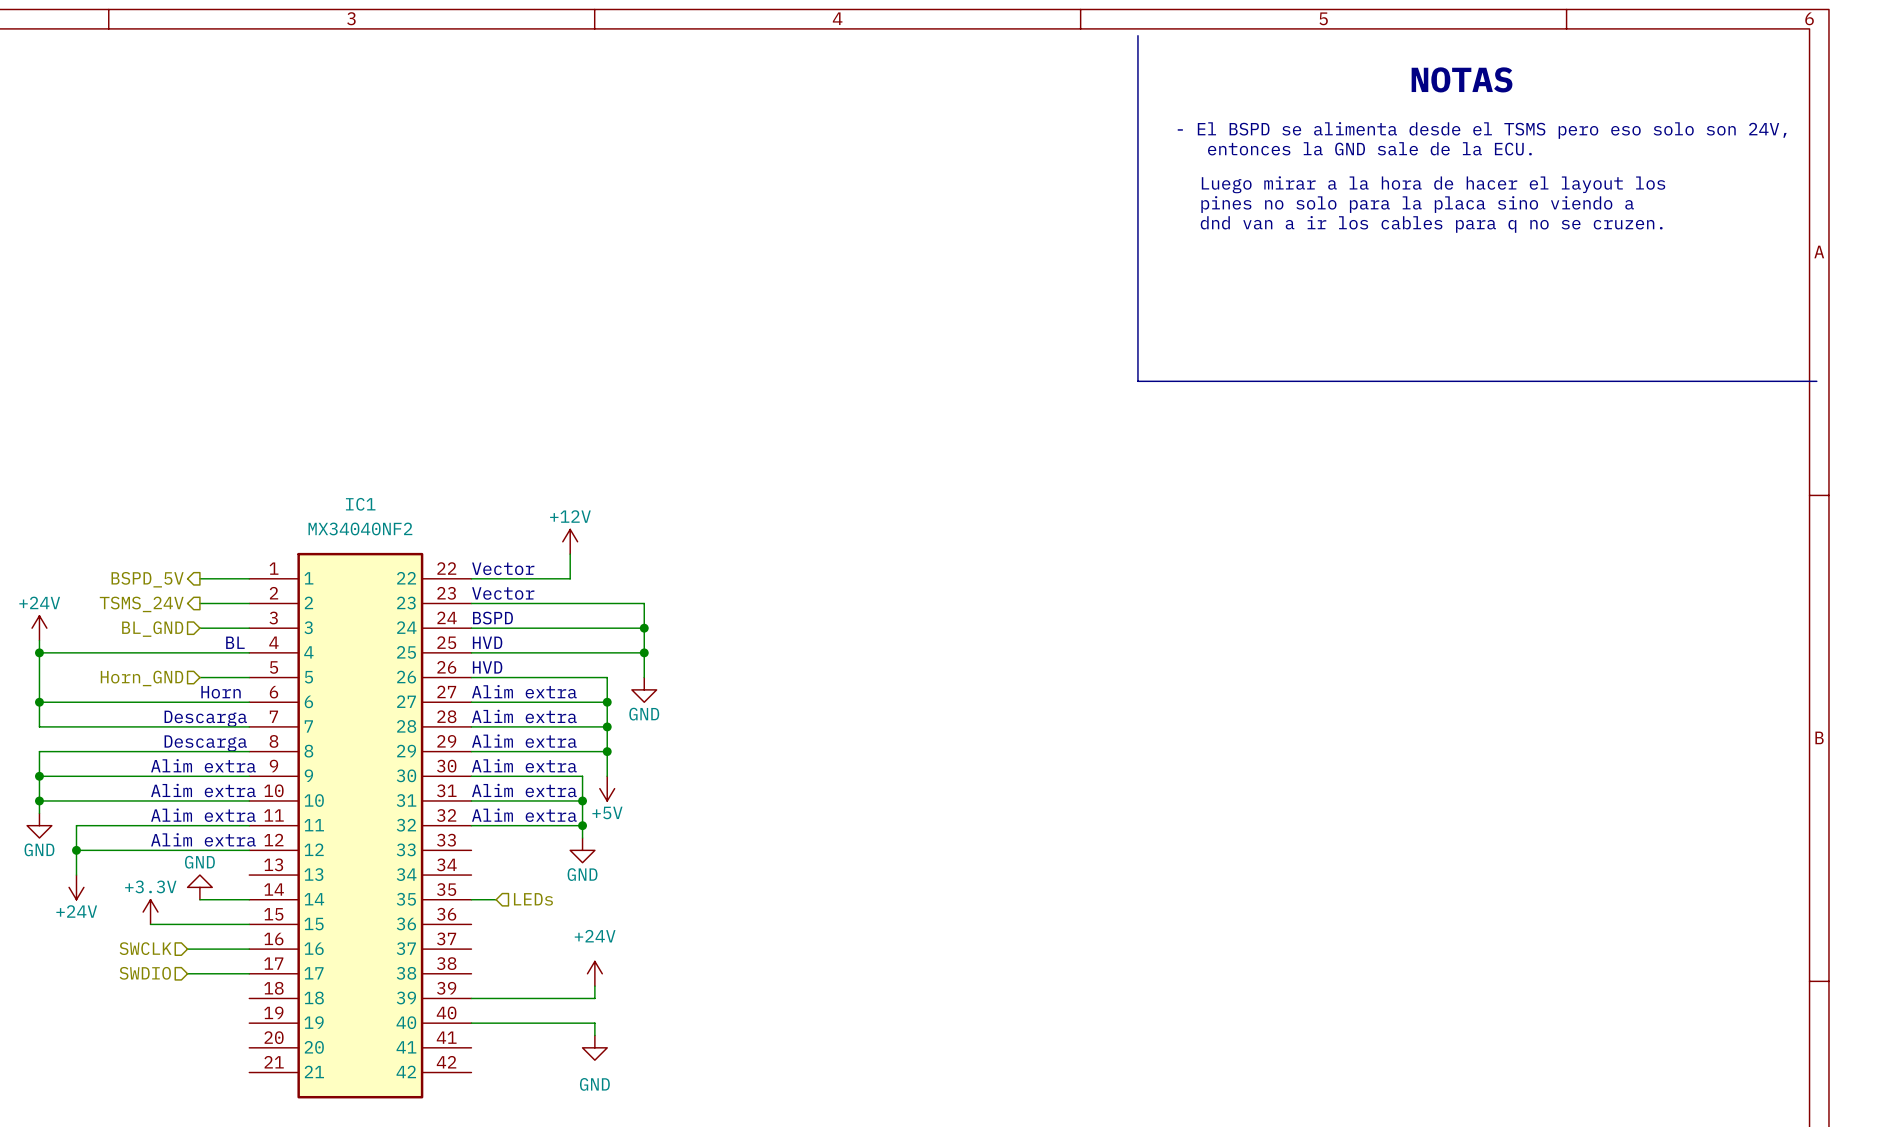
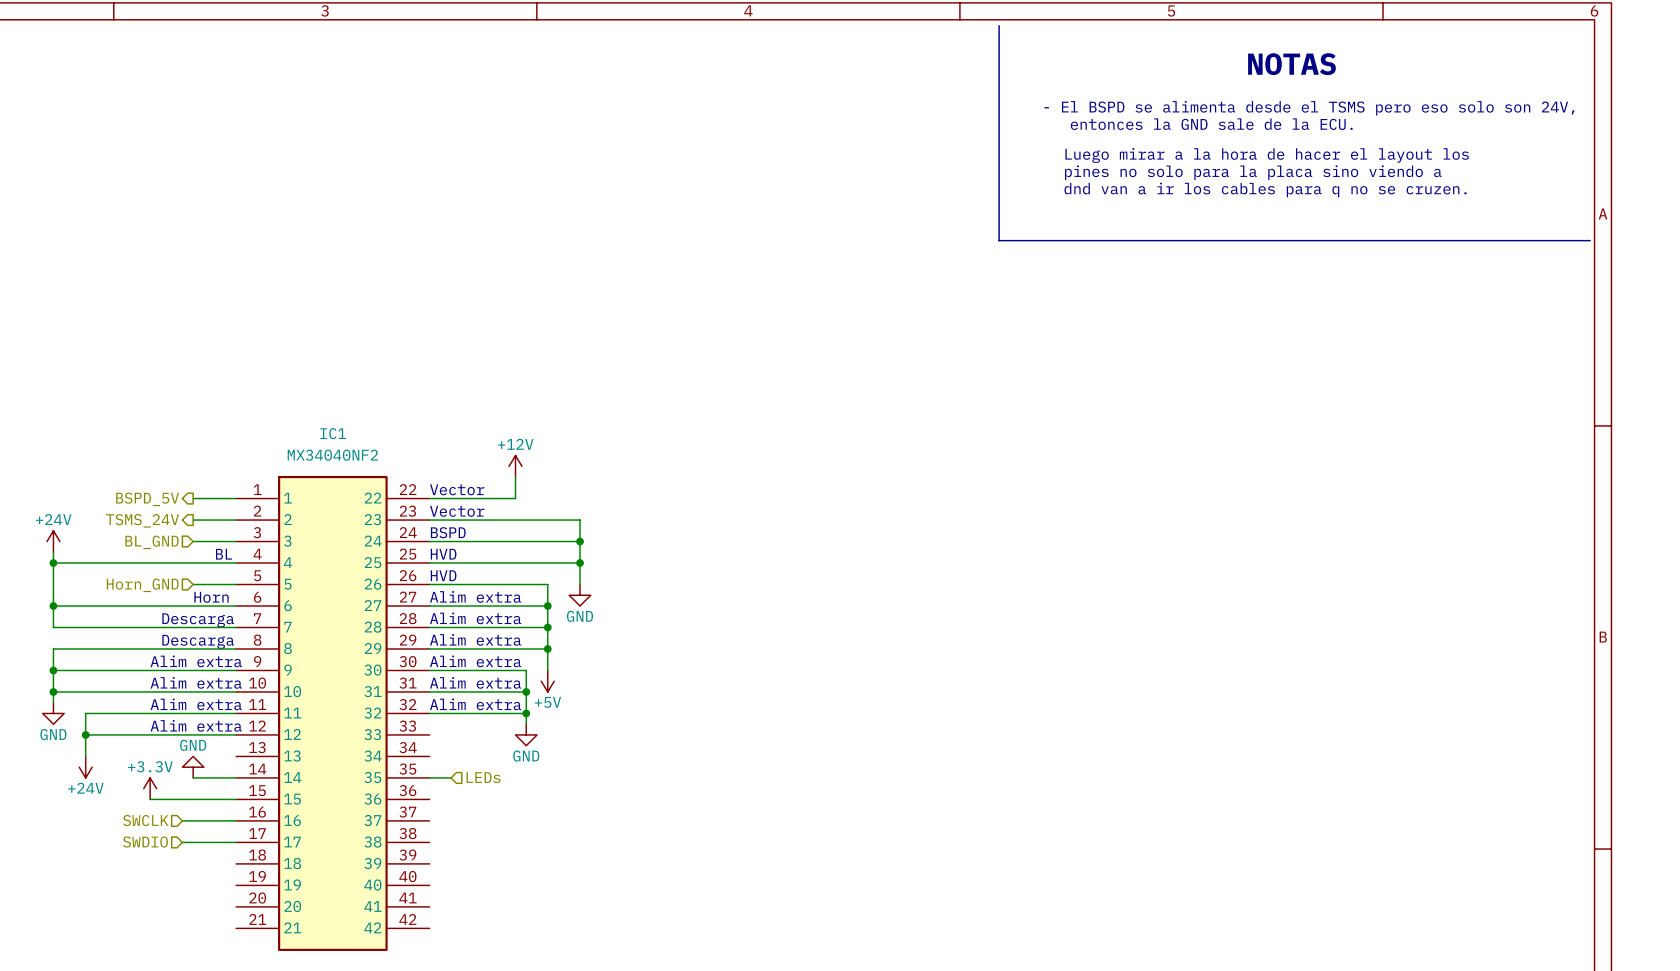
line: none -> (999, 25) (999, 240) (1590, 240)
line: (1137, 35) (1137, 381) (1816, 381) -> none
power symbol: +24V (594, 973) -> none
wire: (594, 986) (594, 998) (471, 998) -> none
wire: (471, 1023) (594, 1023) (594, 1035) -> none
power symbol: GND (594, 1047) -> none

